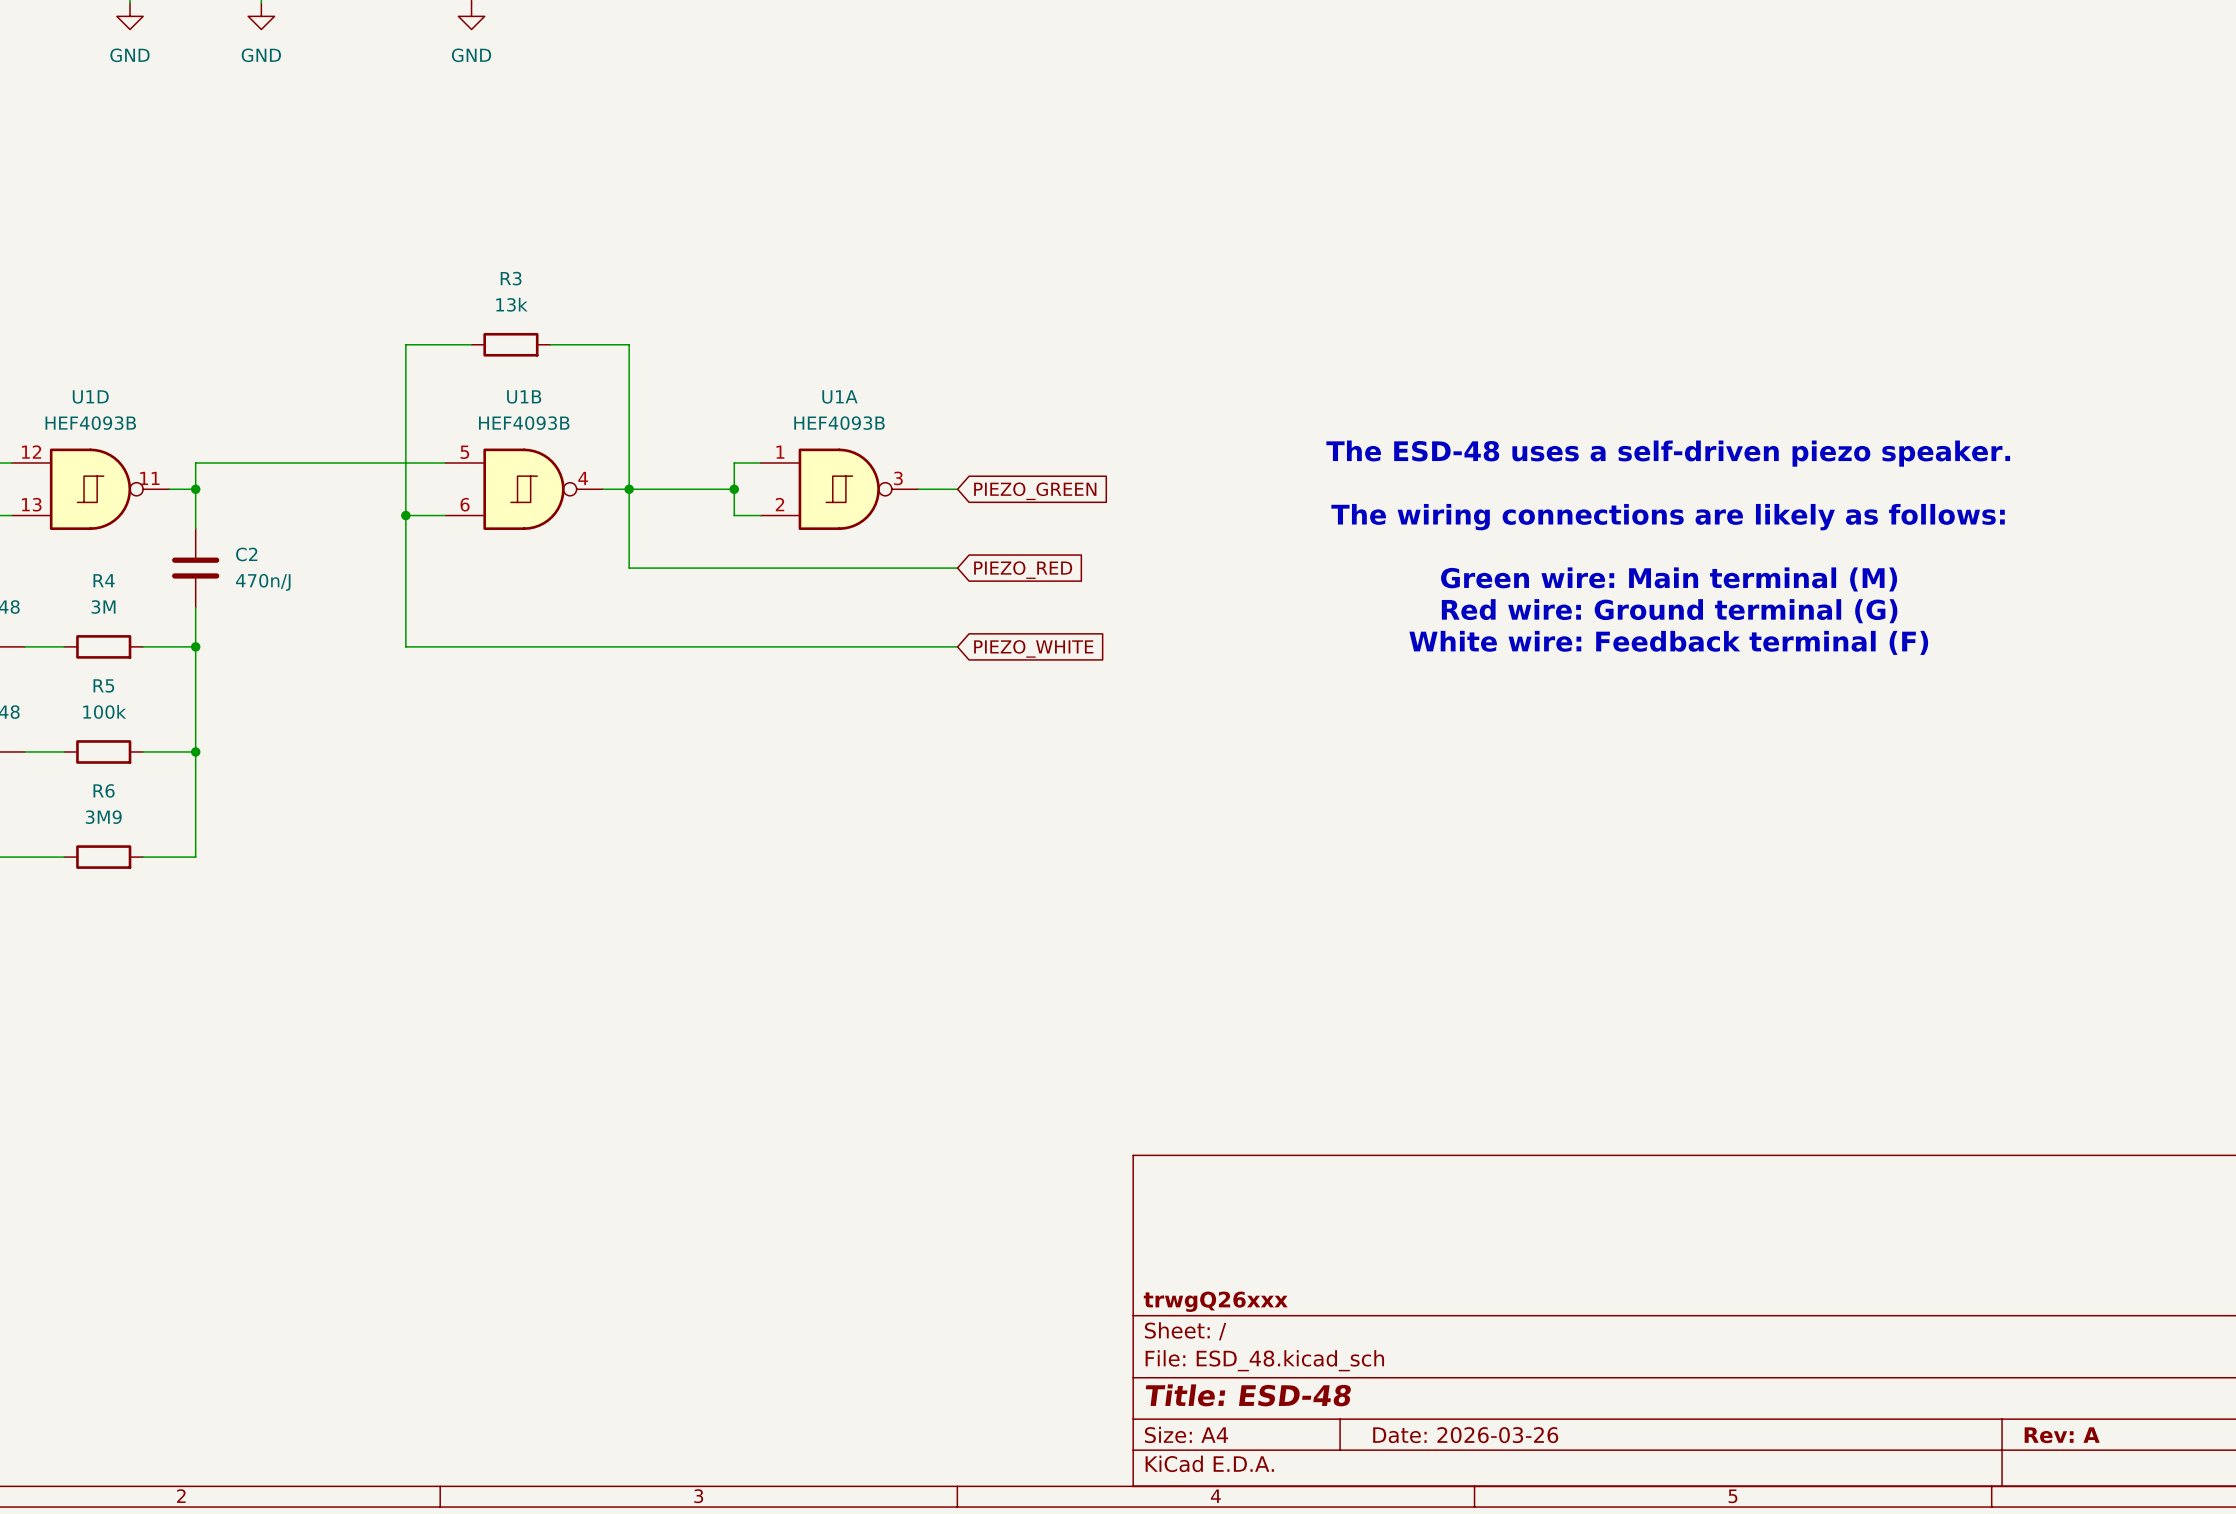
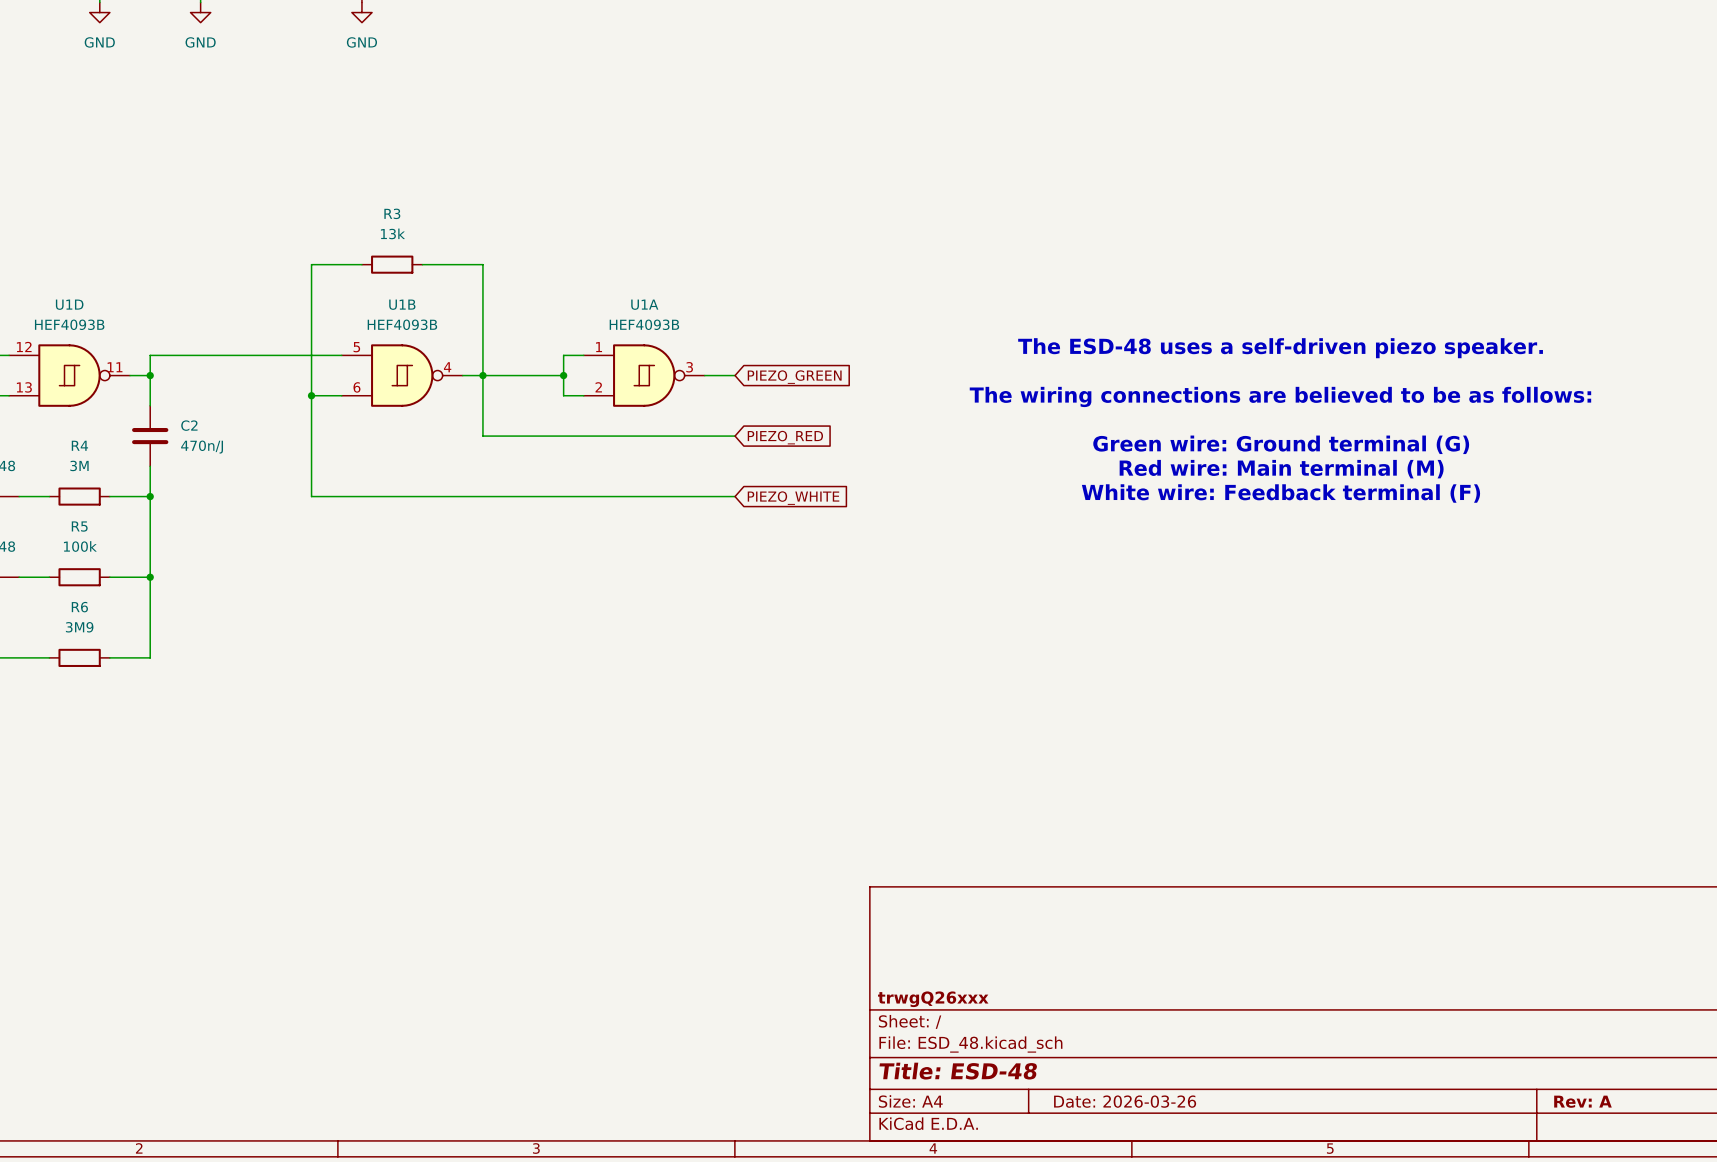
text: The wiring connections are likely as follows: (1668, 517) -> The wiring connections are believed to be as follows: (1280, 396)
text: Green wire: Main terminal (M) (1669, 579) -> Green wire: Ground terminal (G) (1281, 444)
text: Red wire: Ground terminal (G) (1669, 611) -> Red wire: Main terminal (M) (1281, 469)

